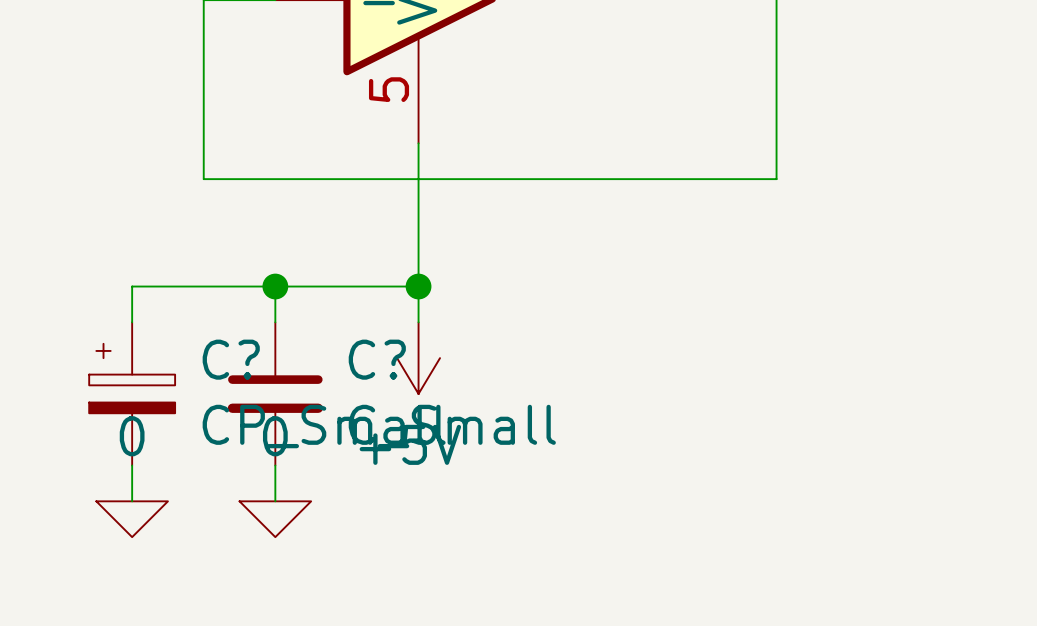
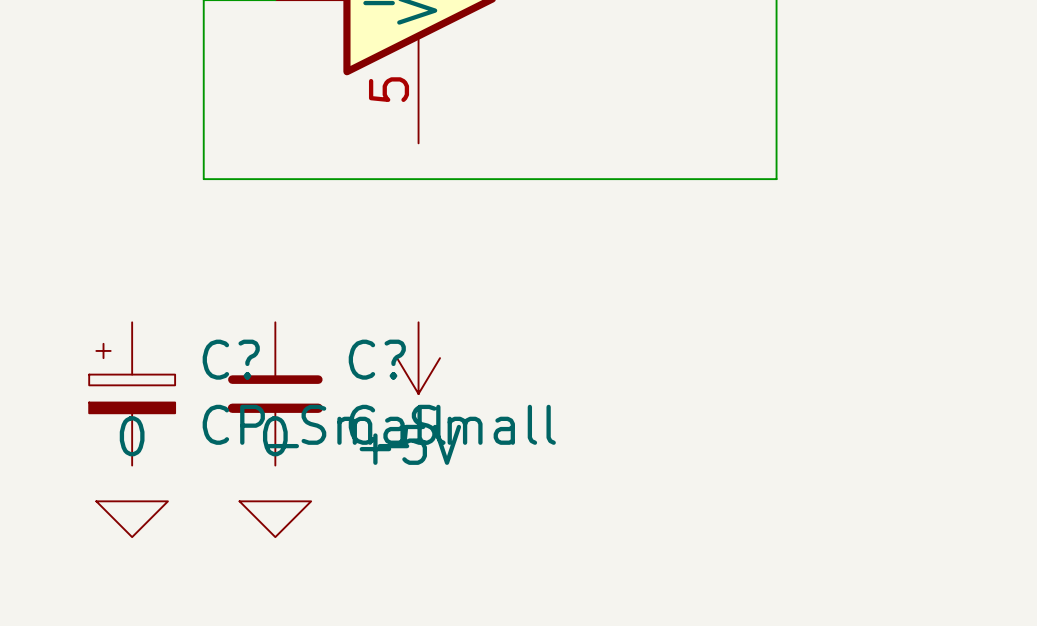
wire: (418, 143) (418, 322) -> none
wire: (275, 286) (275, 322) -> none
junction: (275, 286) -> none
wire: (418, 286) (132, 286) (132, 322) -> none
junction: (418, 286) -> none
wire: (132, 465) (132, 501) -> none
wire: (275, 465) (275, 501) -> none

